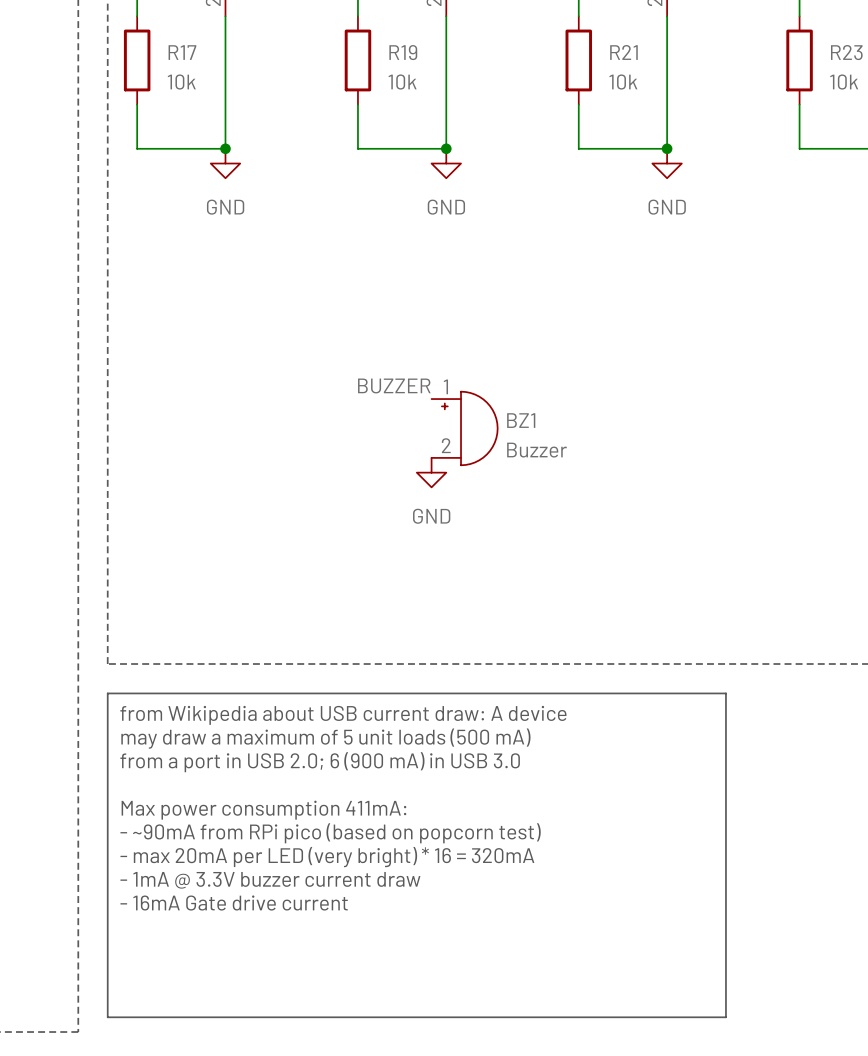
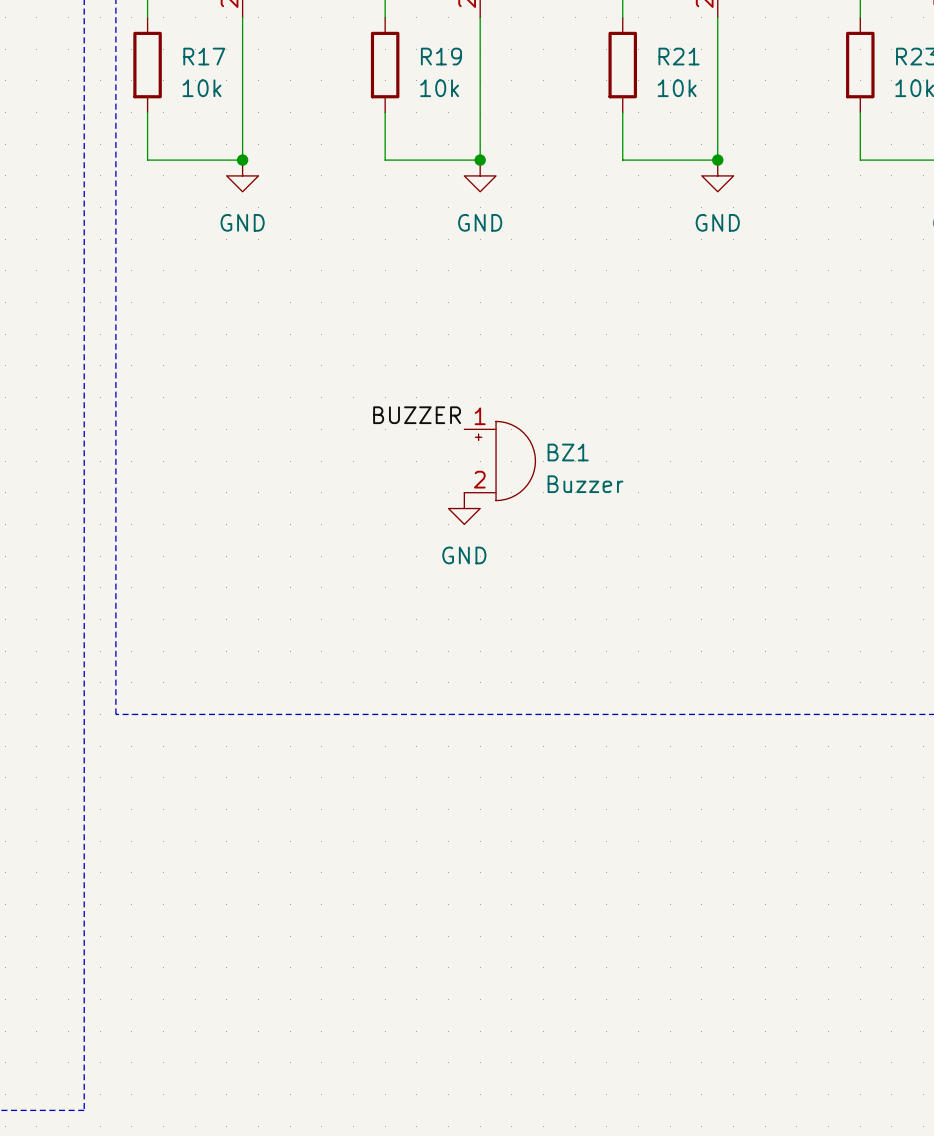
line: (107, 693) (725, 693) (725, 1017) (107, 1017) (107, 693) -> none
text: from Wikipedia about USB current draw: A device (343, 715) -> none
text: may draw a maximum of 5 unit loads (500 mA) (325, 738) -> none
text: from a port in USB 2.0; 6 (900 mA) in USB 3.0 (320, 762) -> none
text: Max power consumption 411mA: (263, 810) -> none
text: - ~90mA from RPi pico (based on popcorn test) (330, 833) -> none
text: - max 20mA per LED (very bright) * 16 = 320mA (327, 857) -> none
text: - 1mA @ 3.3V buzzer current draw (270, 880) -> none
text: - 16mA Gate drive current (234, 903) -> none

